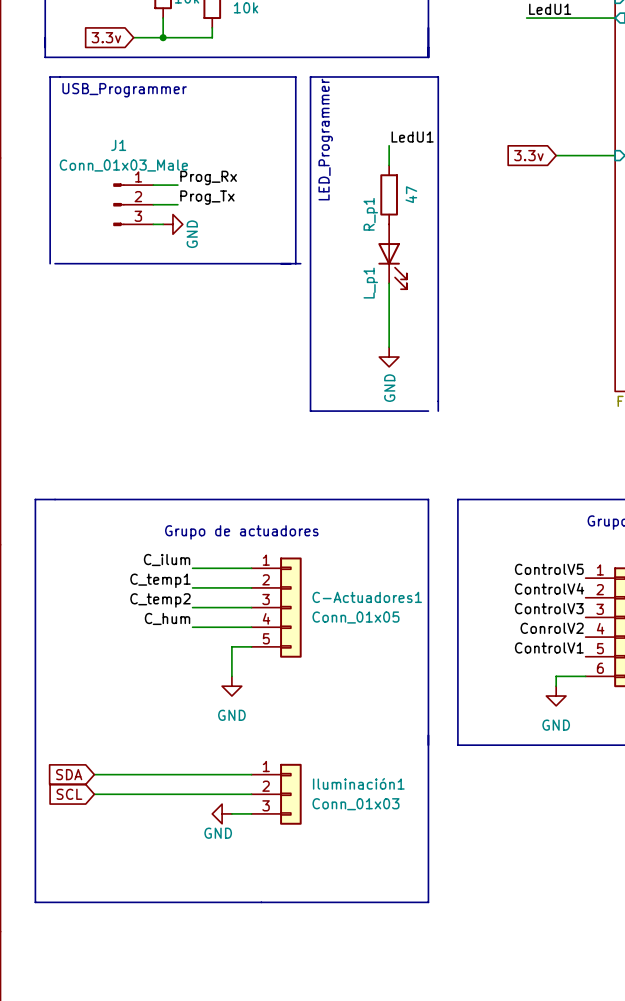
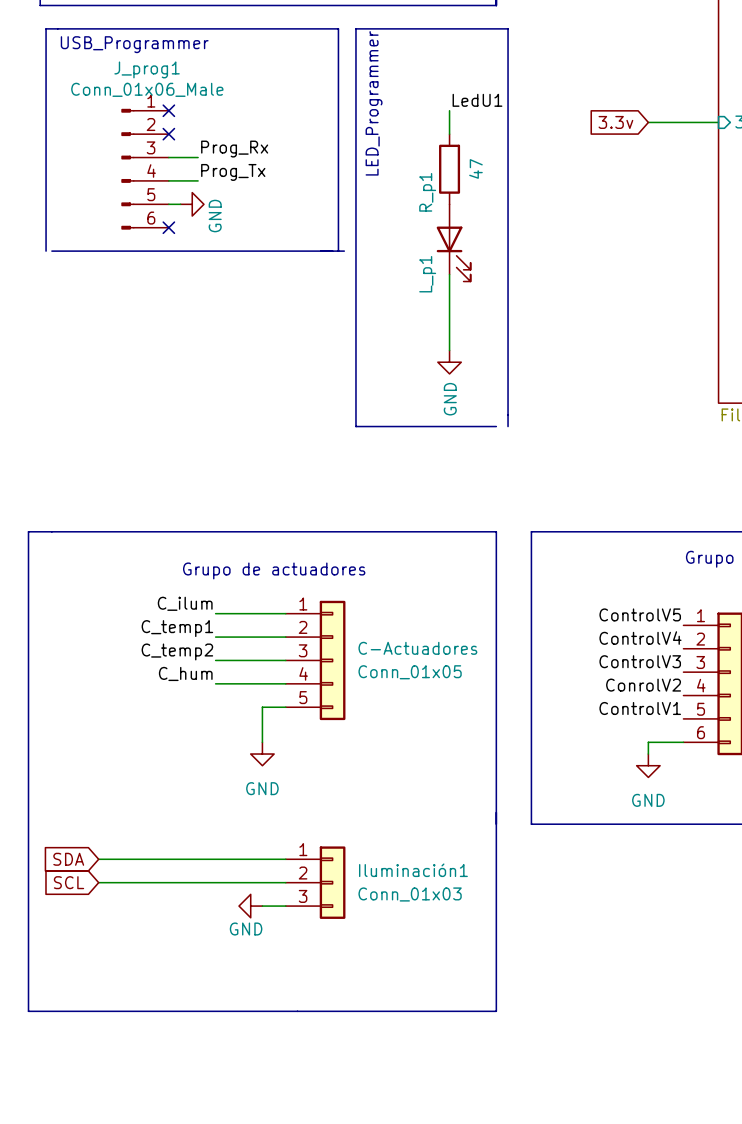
no-connect mark: none -> (168, 110)
no-connect mark: none -> (168, 134)
J_prog1: none -> Conn_01x06_Male (145, 169)
J1: Conn_01x03_Male (133, 204) -> none
no-connect mark: none -> (168, 227)
C-Actuadores1 name: C-Actuadores1 (367, 597) -> C-Actuadores (417, 648)

